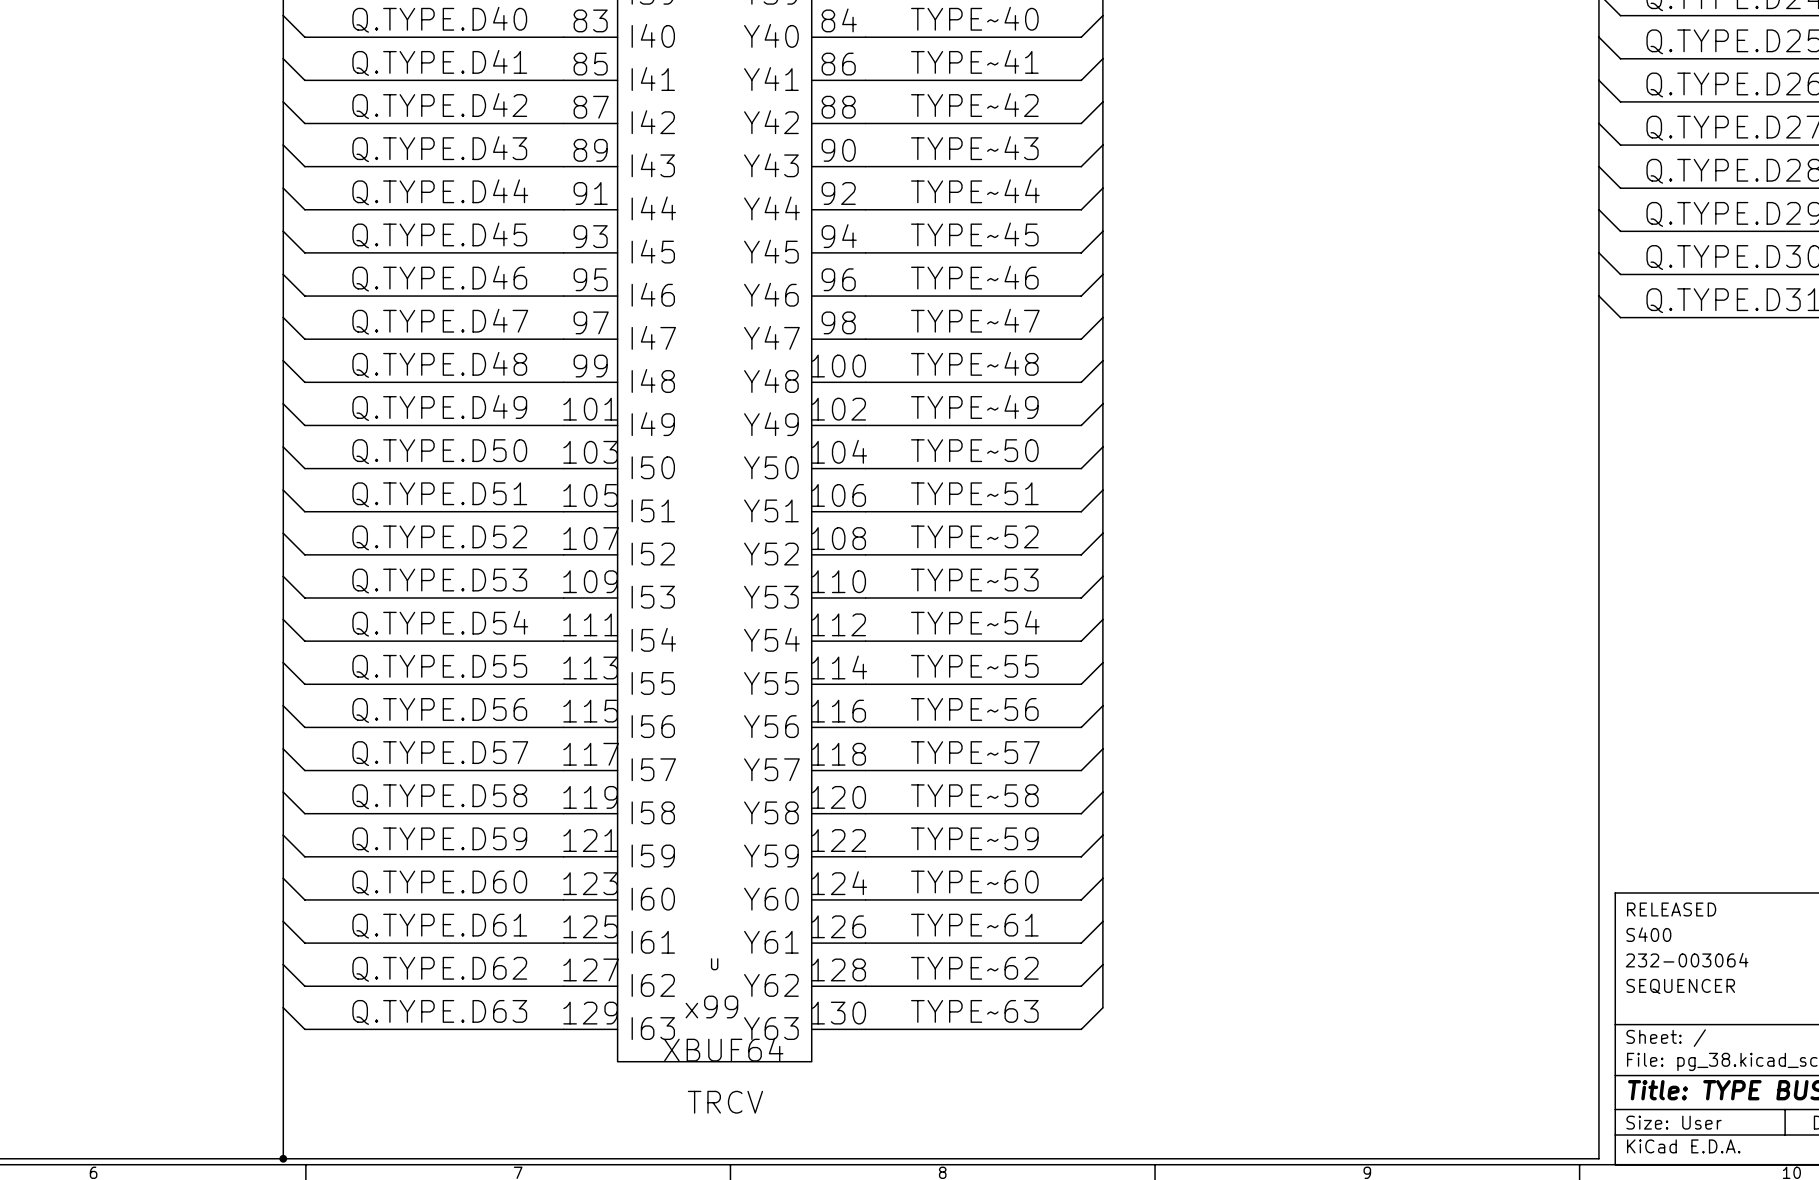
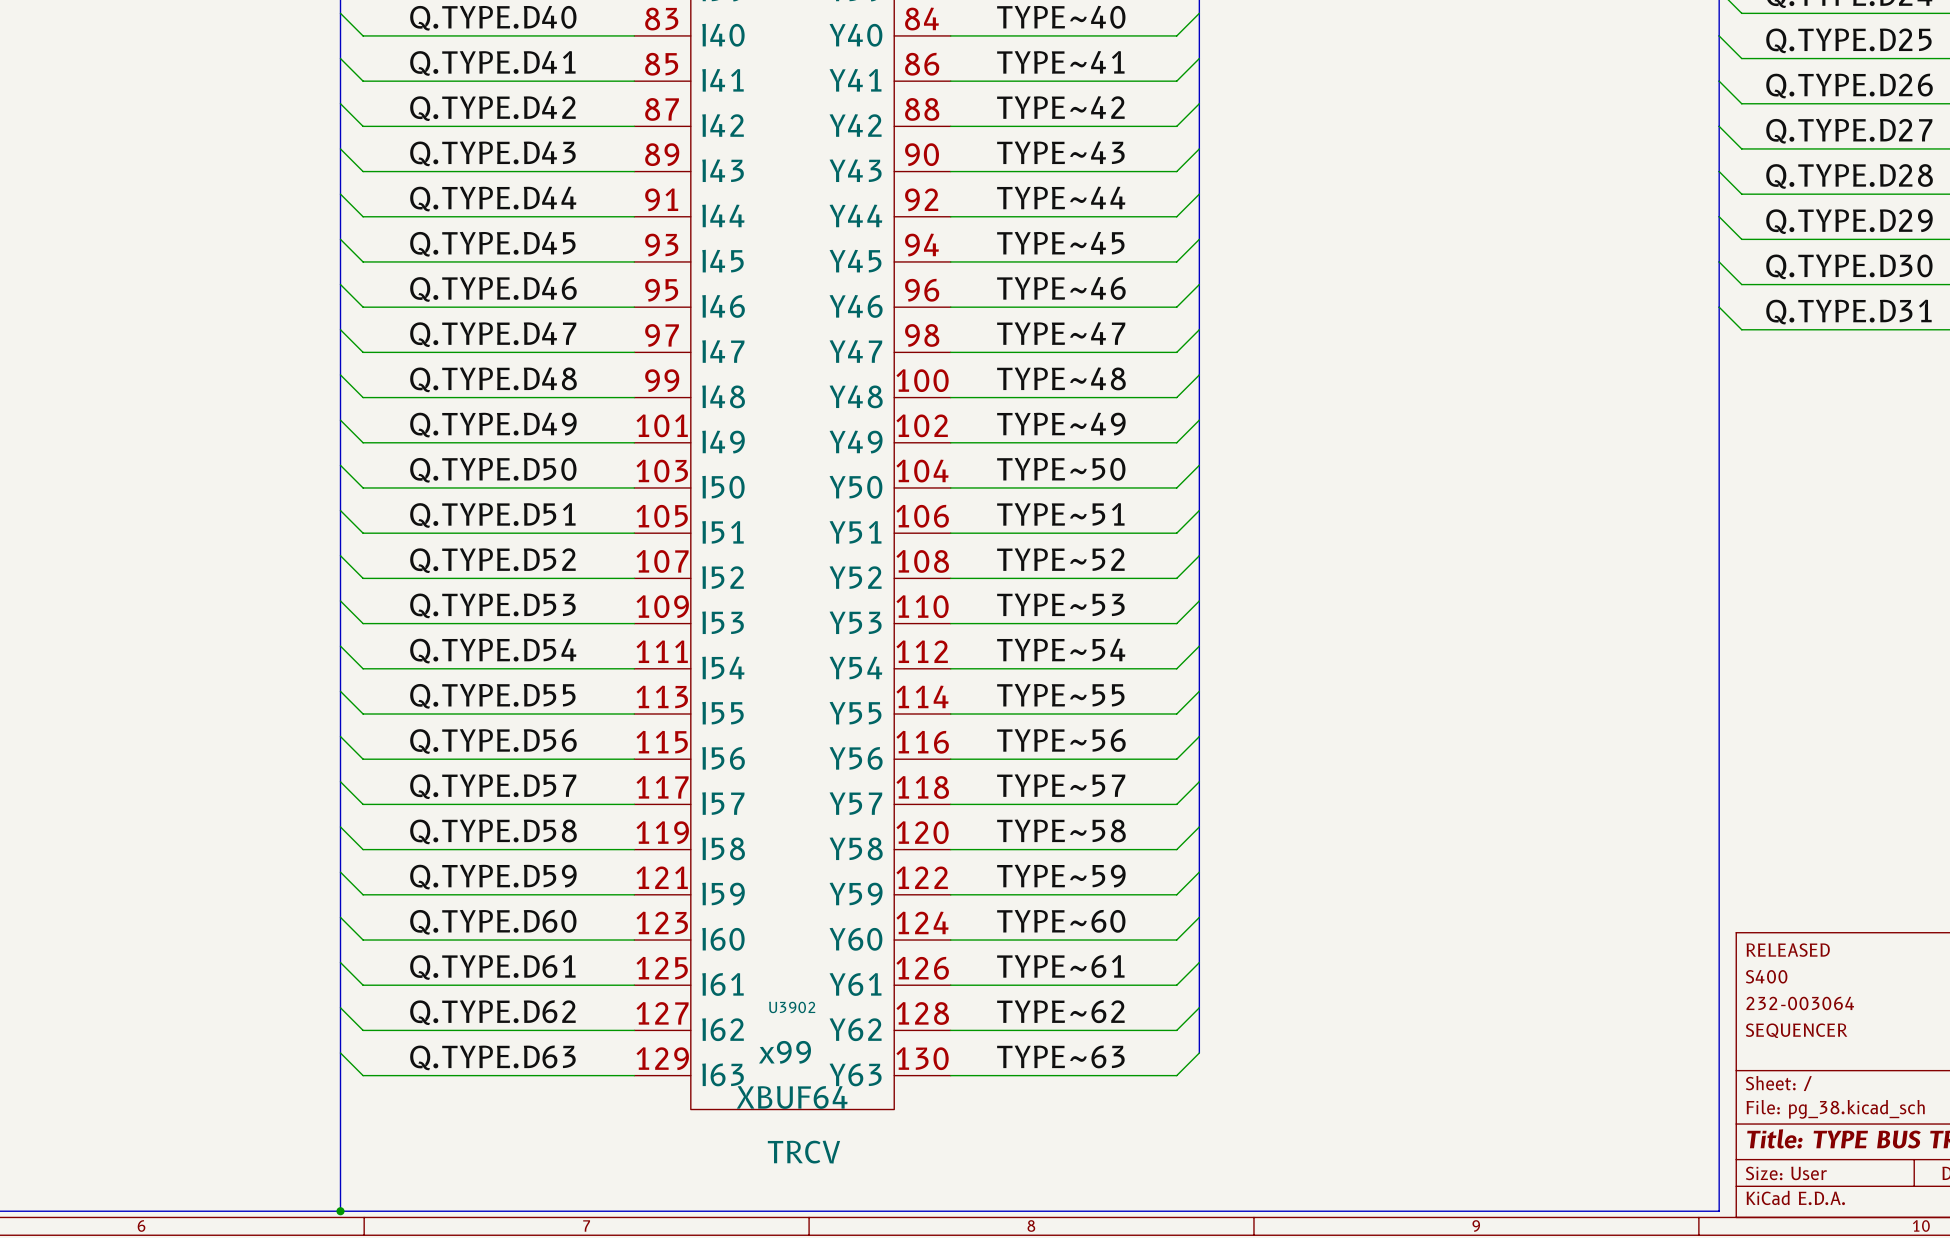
U name: U (714, 964) -> U3902 (792, 1007)

